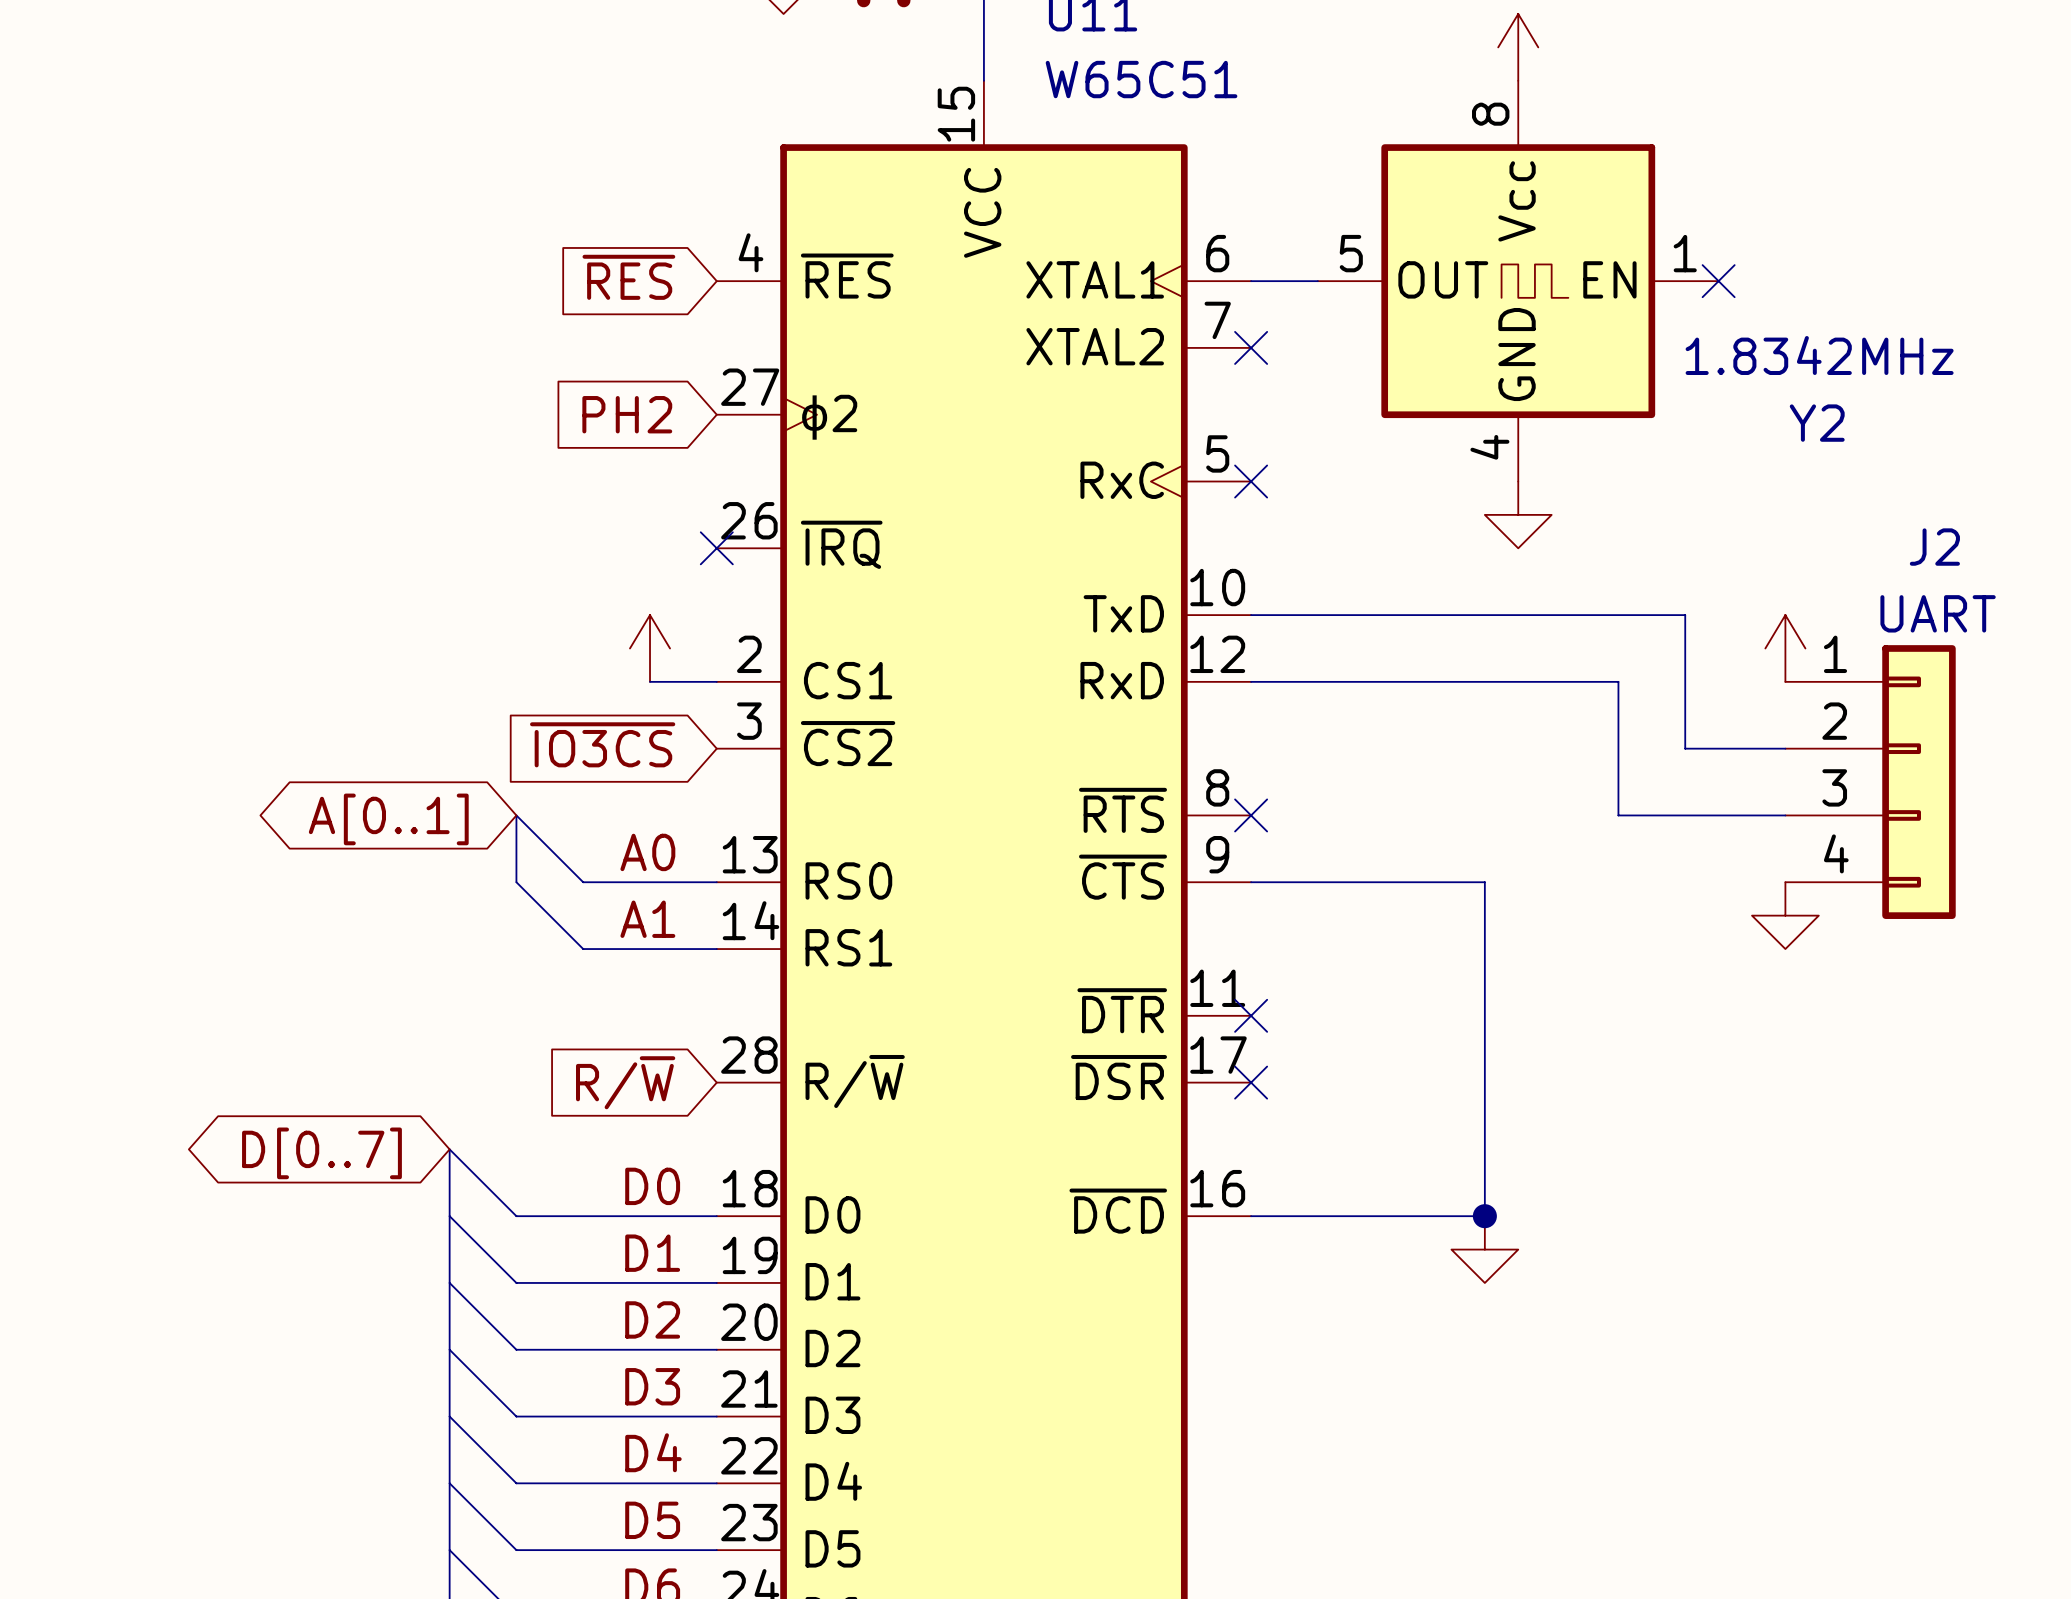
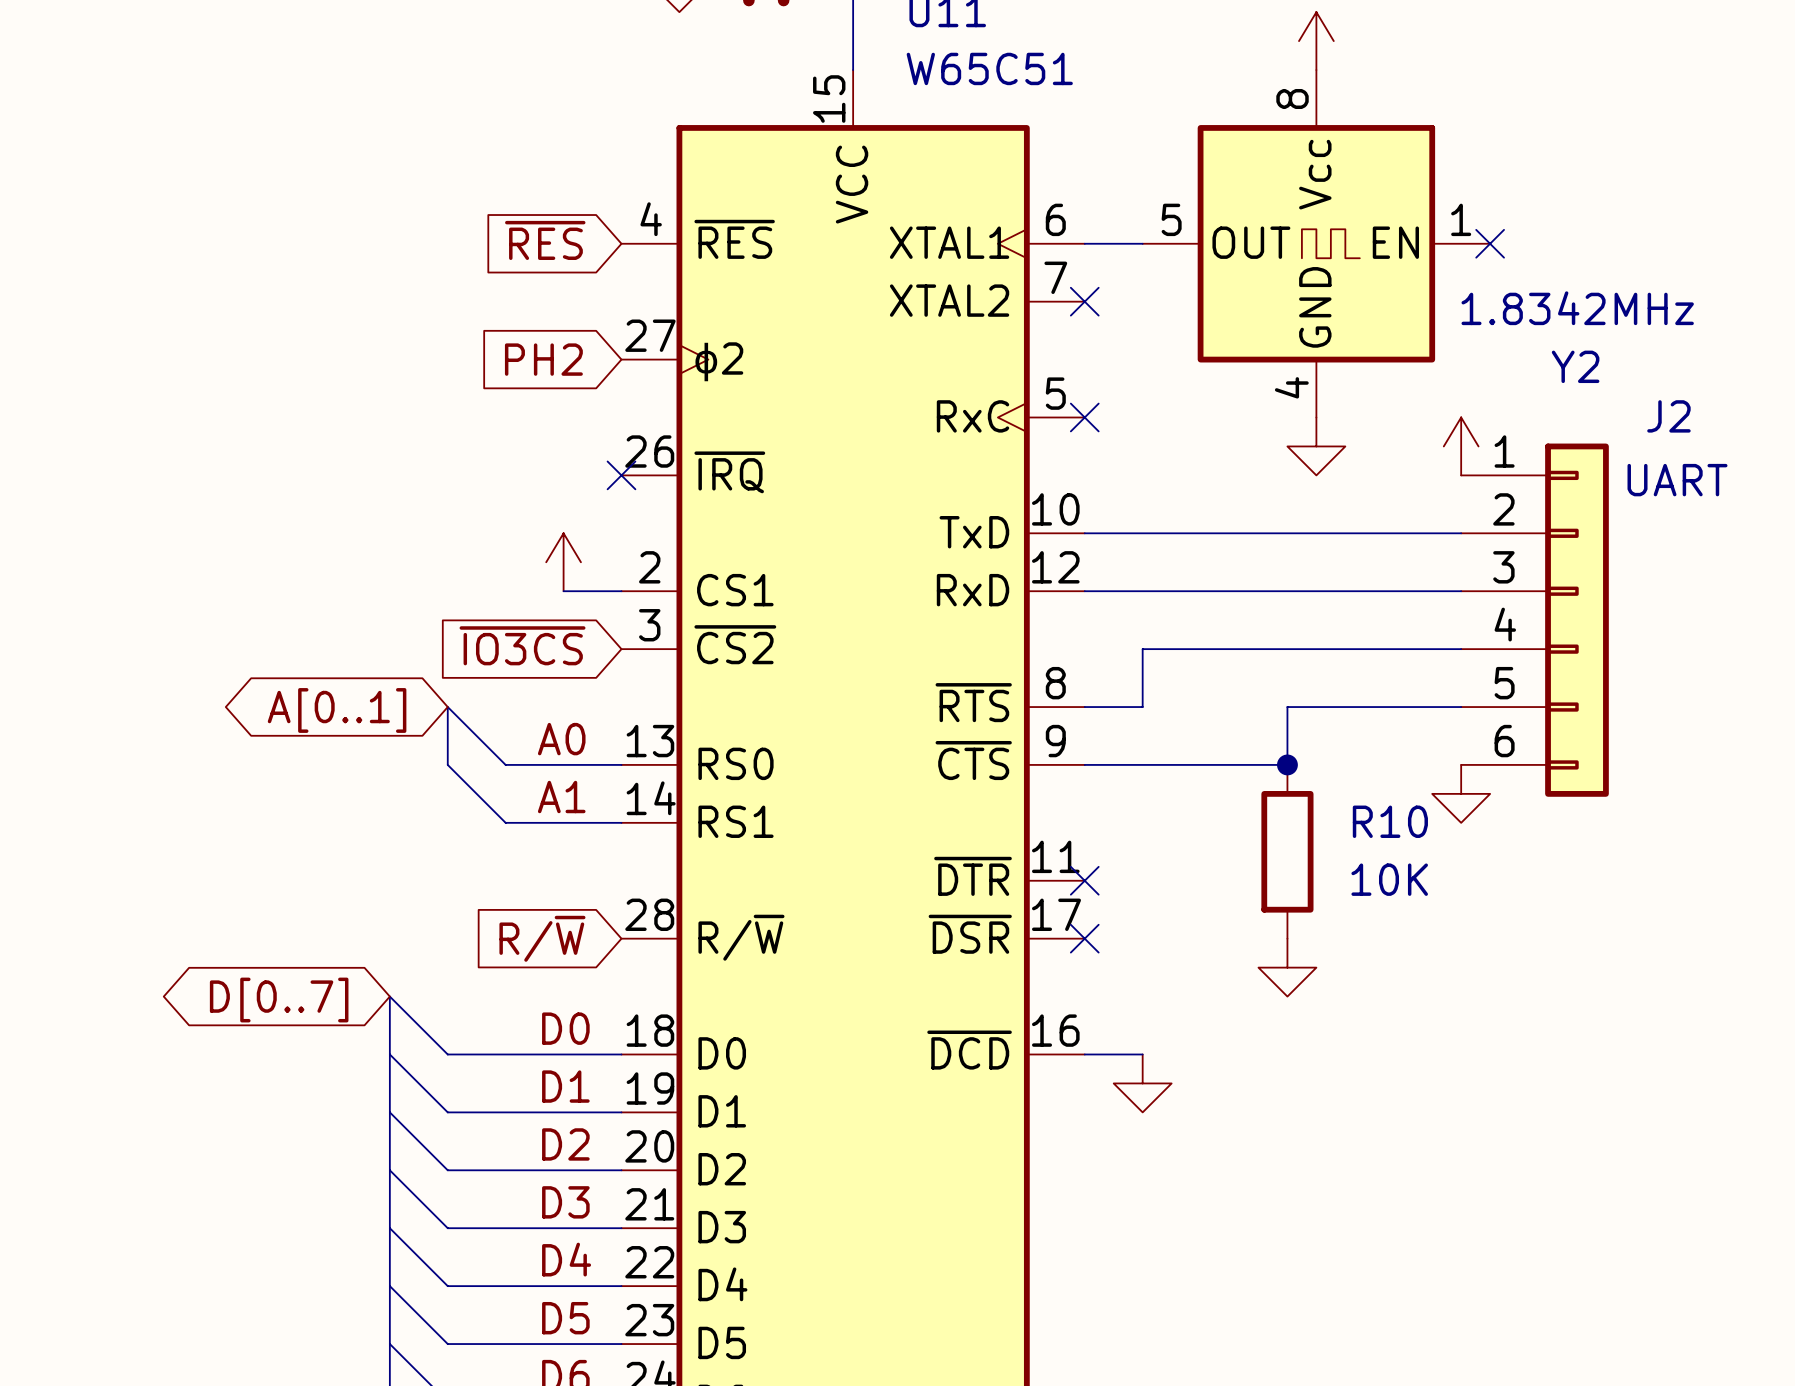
J2 name position: J2 (1934, 547) -> J2 (1668, 416)
J2 value position: UART (1938, 613) -> UART (1677, 480)
wire: (1685, 615) (1685, 748) (1785, 748) -> none
J2 symbol: [1785, 645, 1956, 919] -> [1461, 443, 1609, 797]
power symbol position: (1785, 648) -> (1461, 446)
wire: (1618, 681) (1618, 815) -> (1403, 591) (1461, 591)
wire: none -> (1461, 649) (1142, 649) (1142, 707) (1084, 707)
no-connect mark: (1251, 815) -> none
wire: (1484, 882) (1484, 1216) (1317, 1216) -> (1287, 764) (1287, 707) (1403, 707)
junction: none -> (1287, 764)
power symbol position: (1785, 915) -> (1461, 793)
R10: none -> 10K (1287, 851)
power symbol: none -> (1287, 967)
junction: (1484, 1216) -> none
power symbol: none -> (1142, 1083)
power symbol: (1484, 1249) -> none

